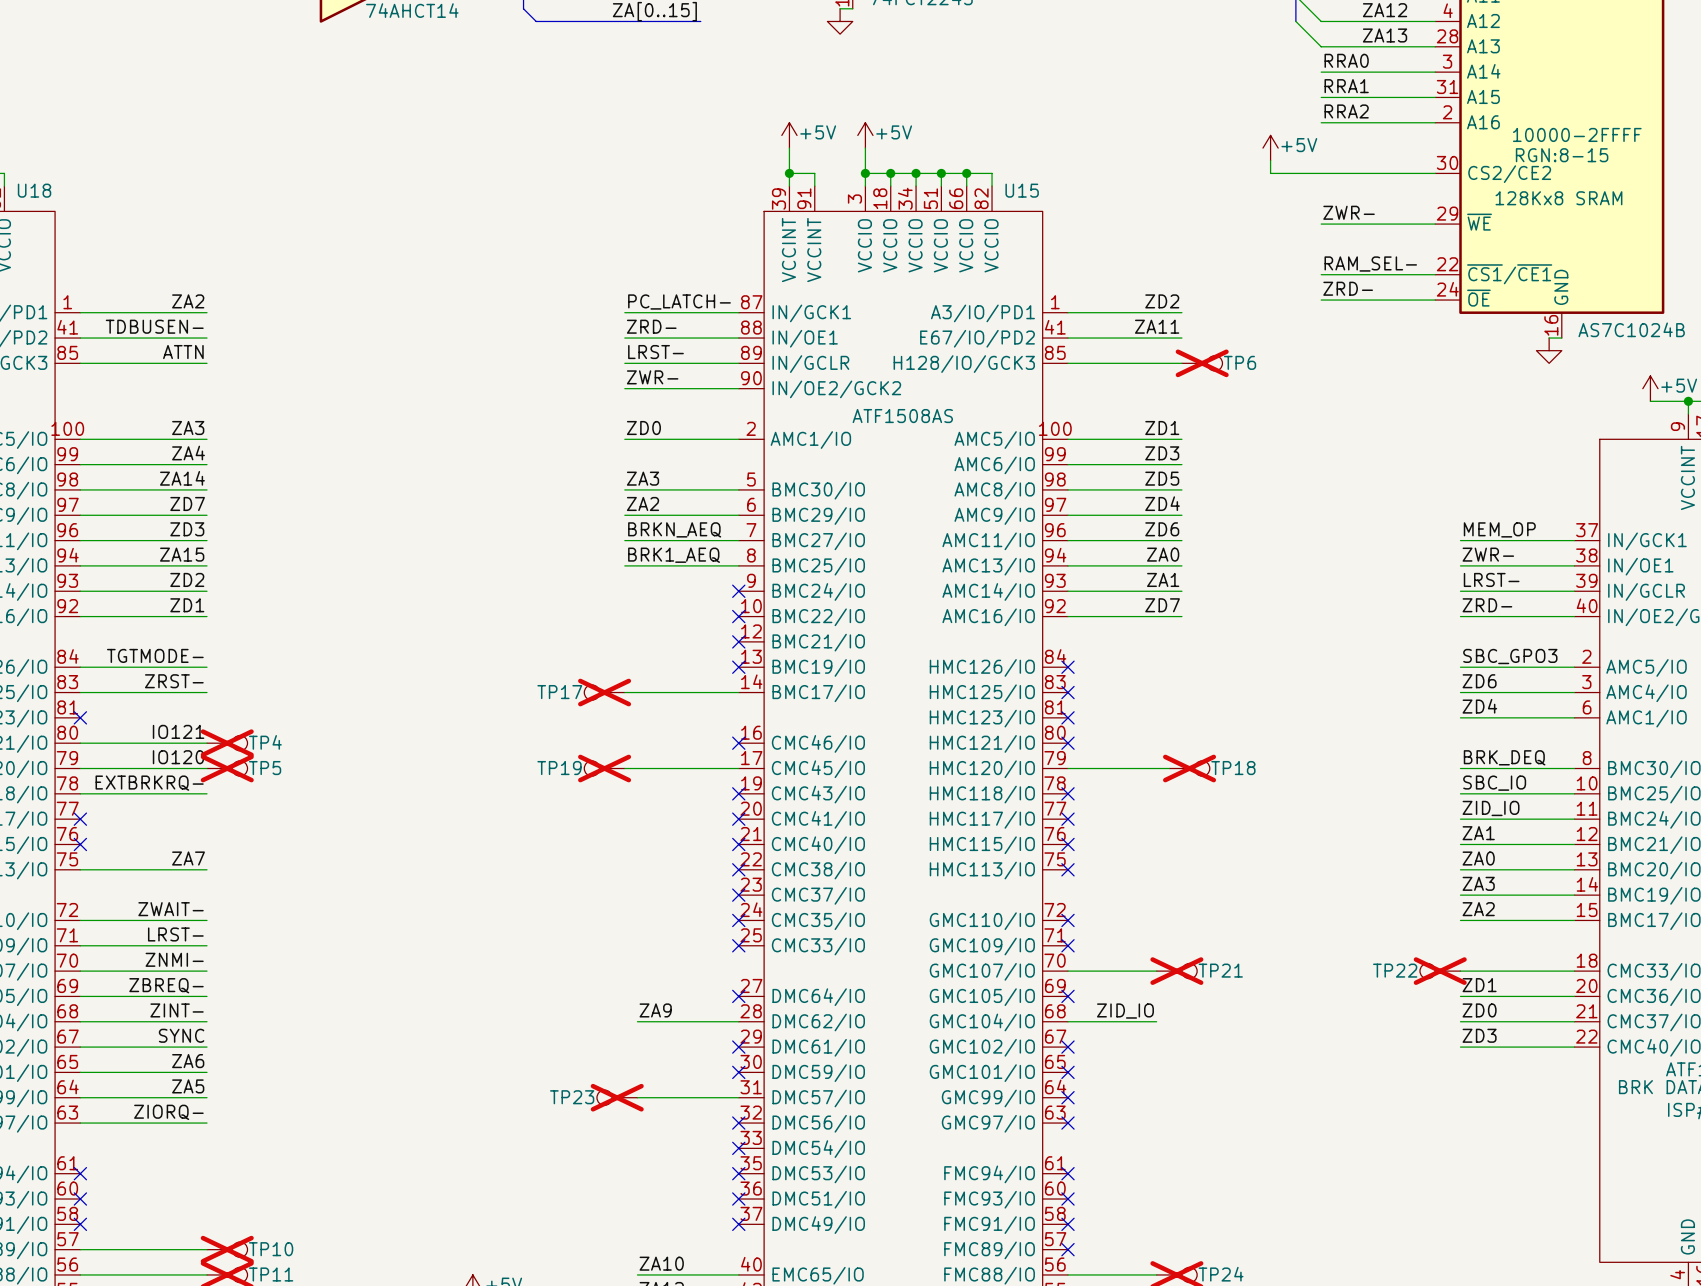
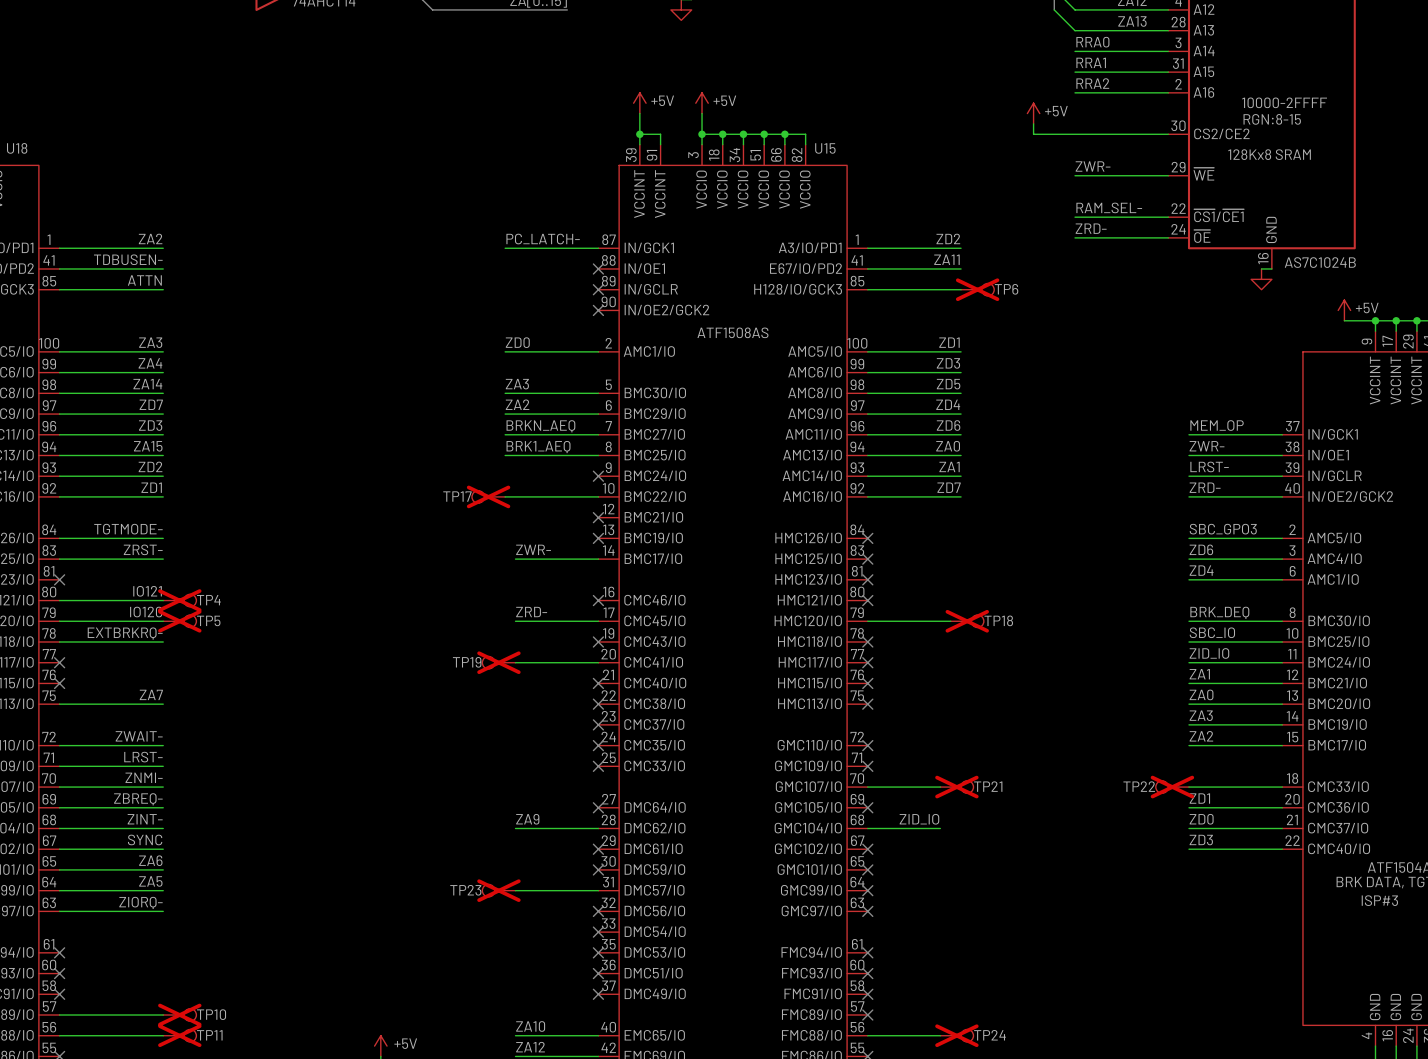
label: ZRD- (651, 326) -> none
wire: (624, 338) (738, 338) -> none
no-connect mark: none -> (598, 268)
label: LRST- (655, 352) -> none
wire: (624, 363) (738, 363) -> none
no-connect mark: none -> (598, 289)
label: ZWR- (652, 377) -> none
wire: (624, 388) (738, 388) -> (505, 496) (598, 496)
no-connect mark: none -> (598, 310)
no-connect mark: (738, 616) -> none
label: none -> ZWR- (533, 549)
TP17 position: (604, 692) -> (488, 496)
wire: (624, 692) (637, 692) -> none
label: none -> ZRD- (531, 612)
TP19 position: (604, 768) -> (498, 662)
wire: (624, 768) (637, 768) -> none
wire: none -> (515, 662) (598, 662)
no-connect mark: (738, 819) -> none

